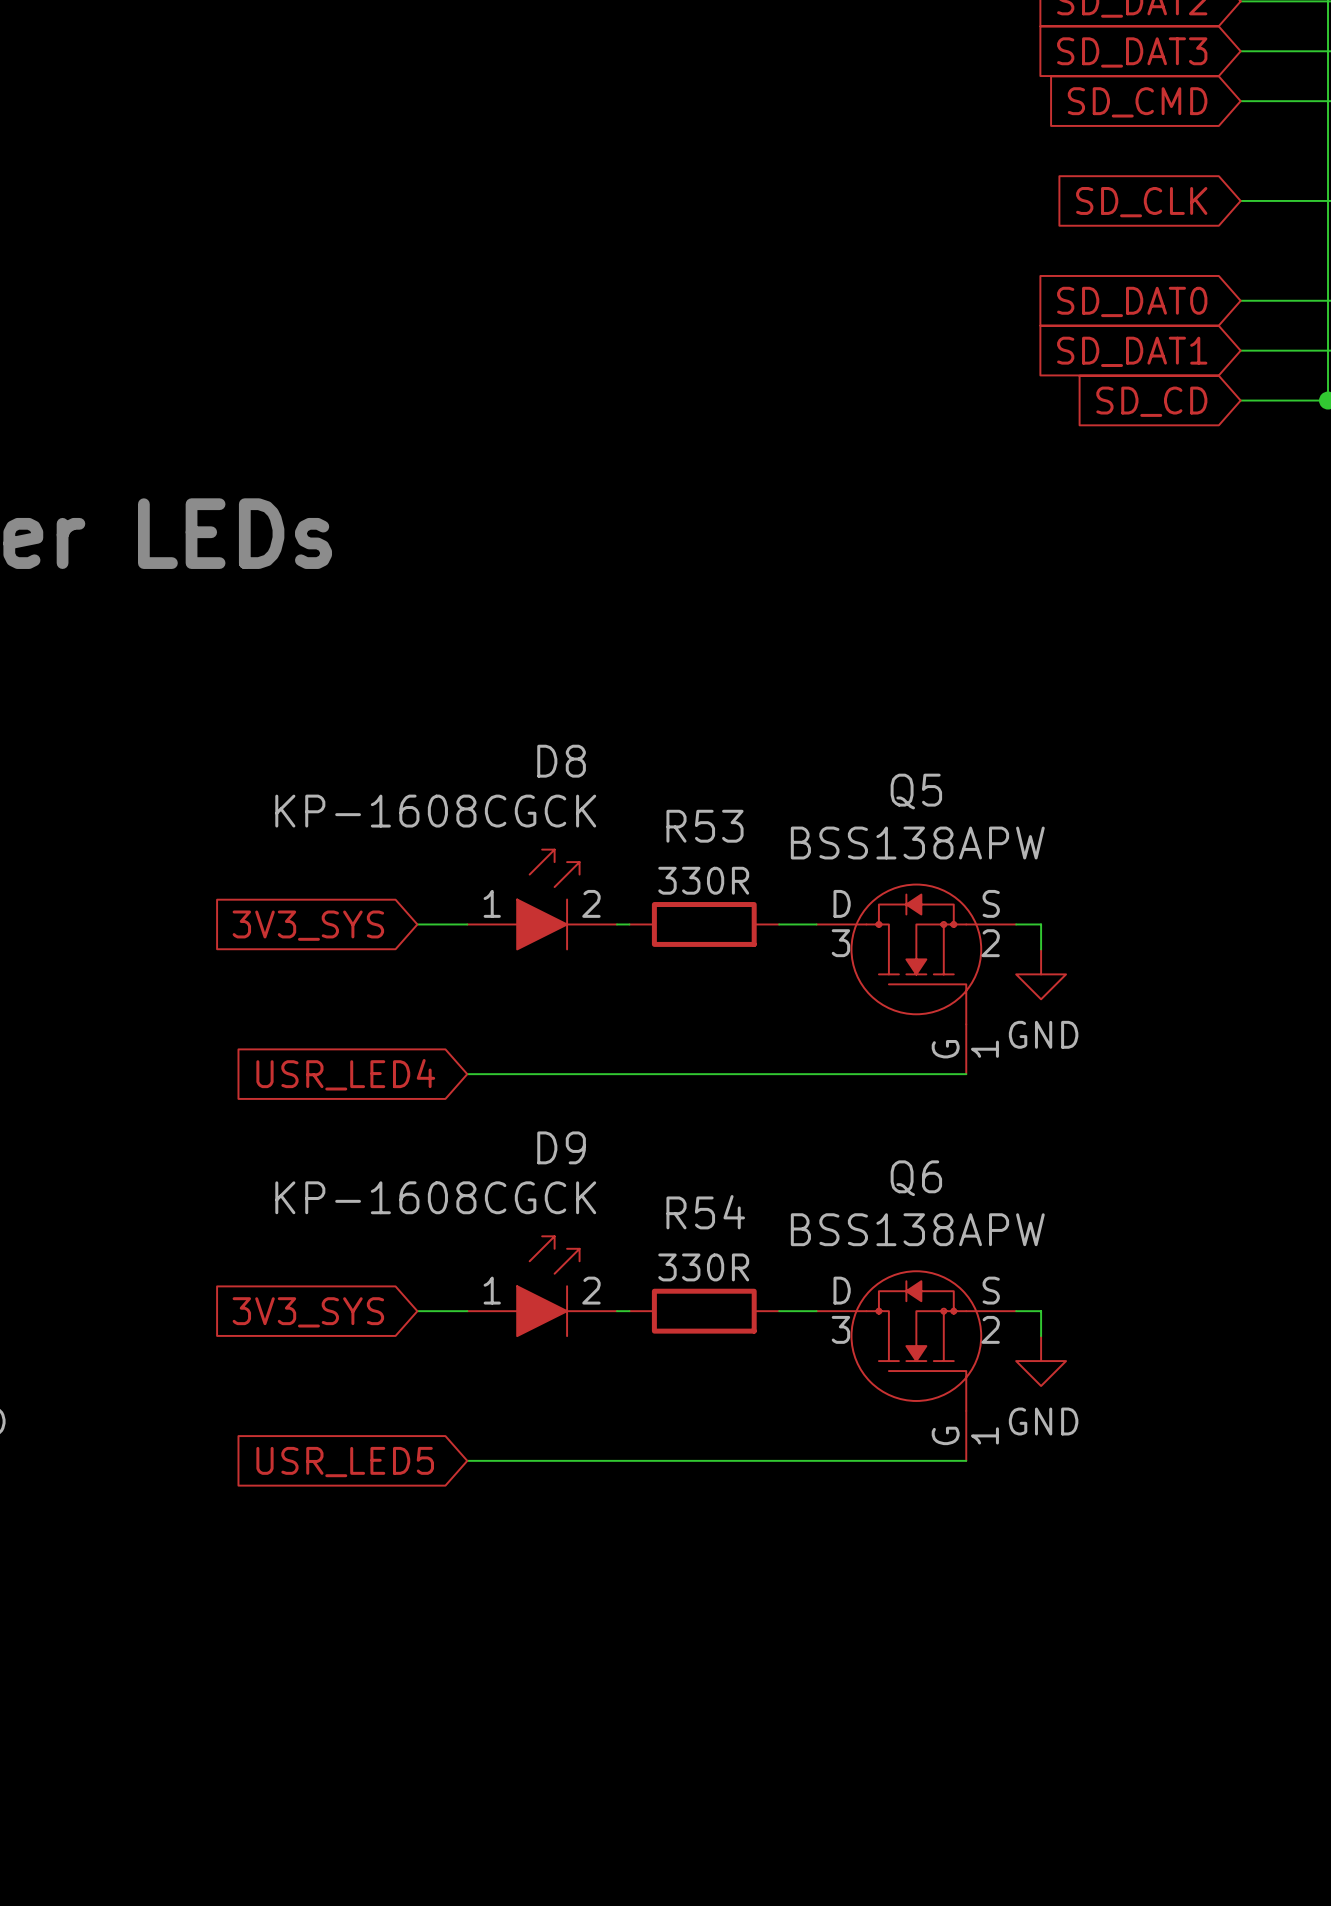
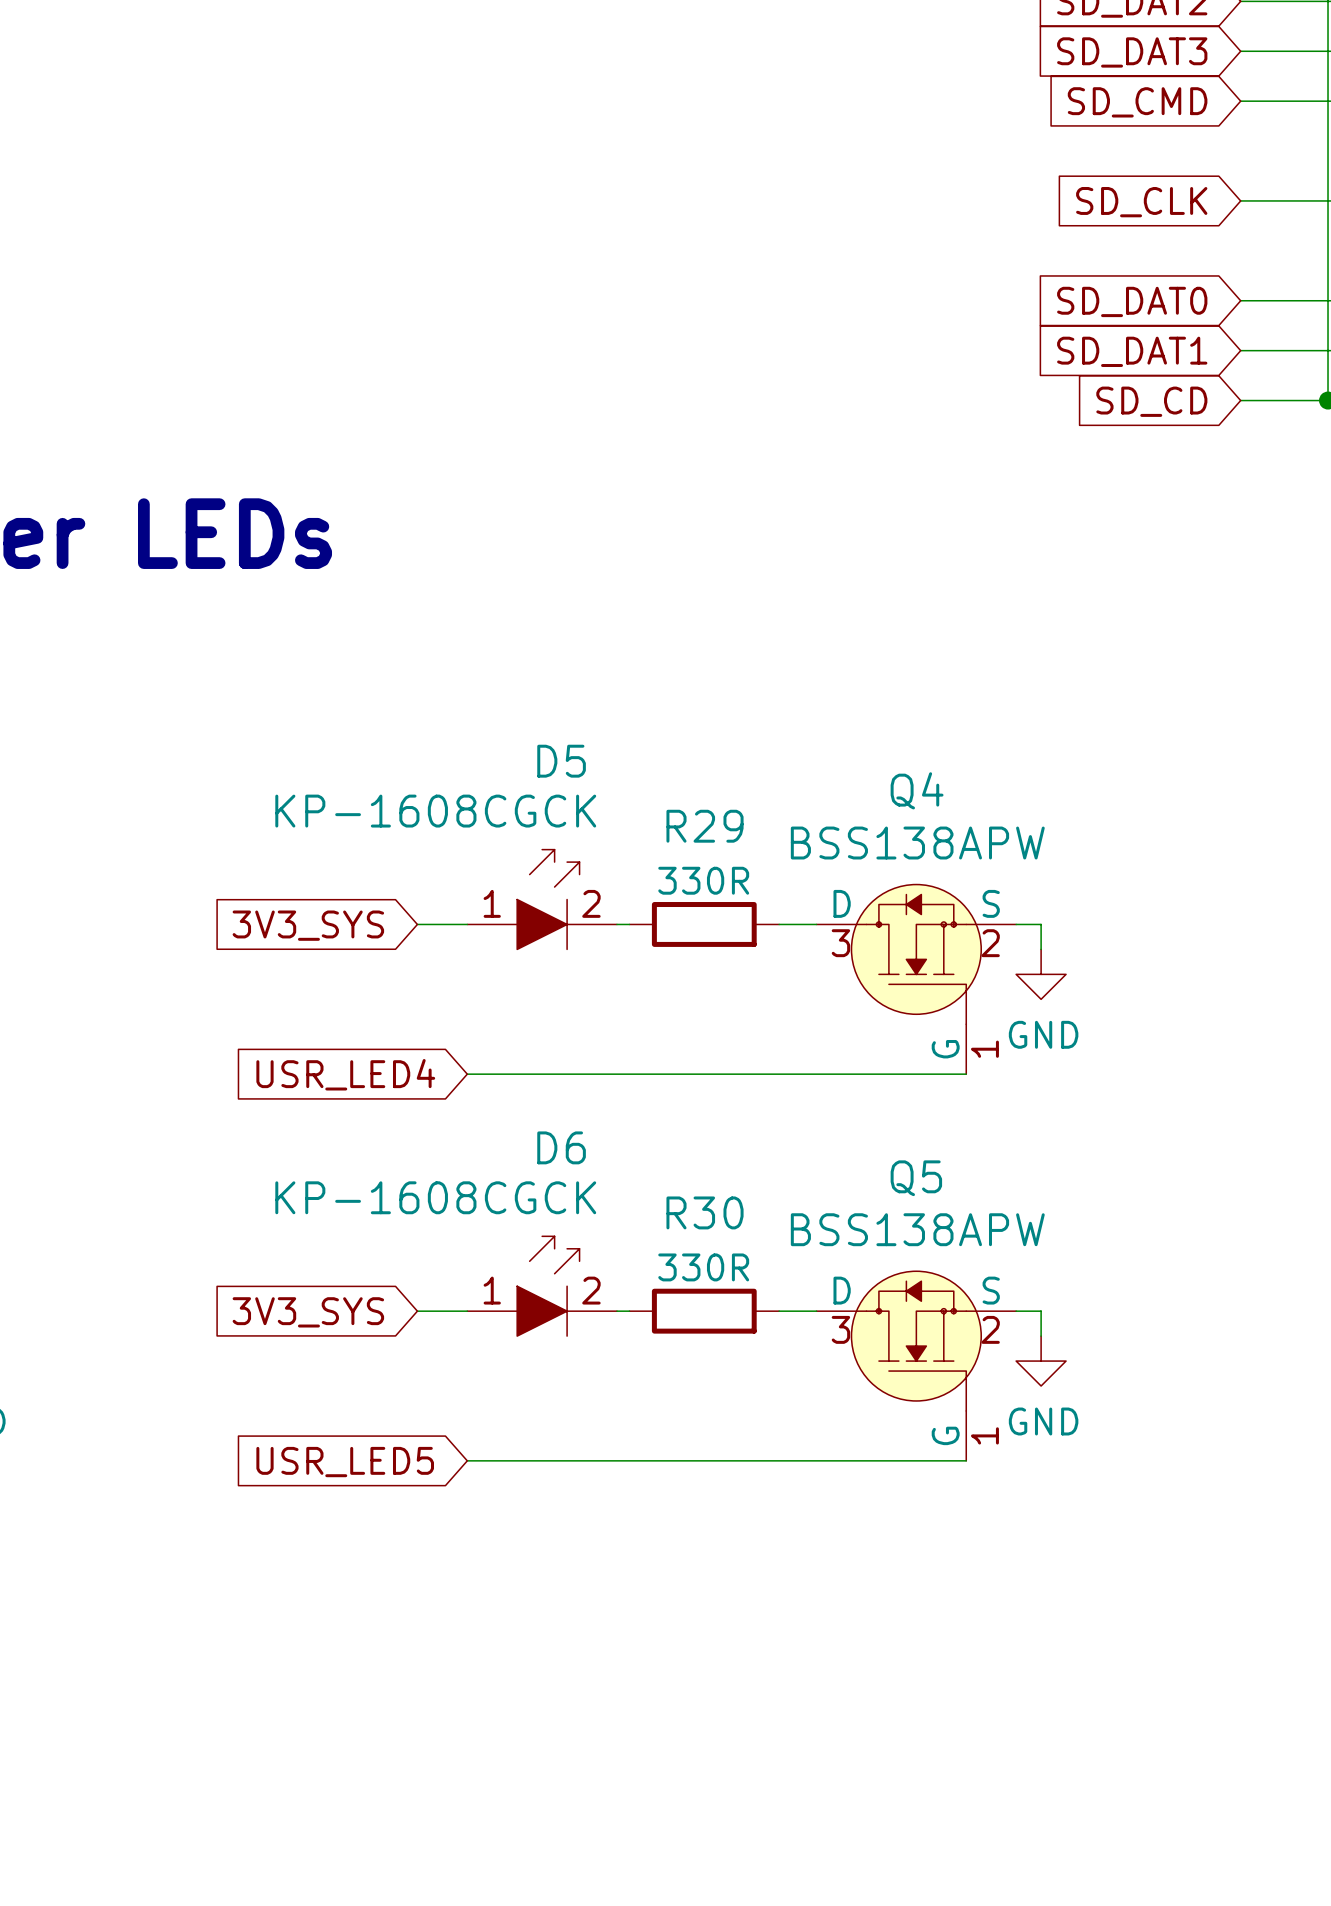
D8 name: D8 (561, 761) -> D5 (561, 761)
Q5 name: Q5 (916, 791) -> Q4 (917, 790)
R53 name: R53 (705, 826) -> R29 (705, 826)
D9 name: D9 (561, 1147) -> D6 (561, 1147)
Q6 name: Q6 (916, 1178) -> Q5 (916, 1178)
R54 name: R54 (705, 1212) -> R30 (705, 1212)

